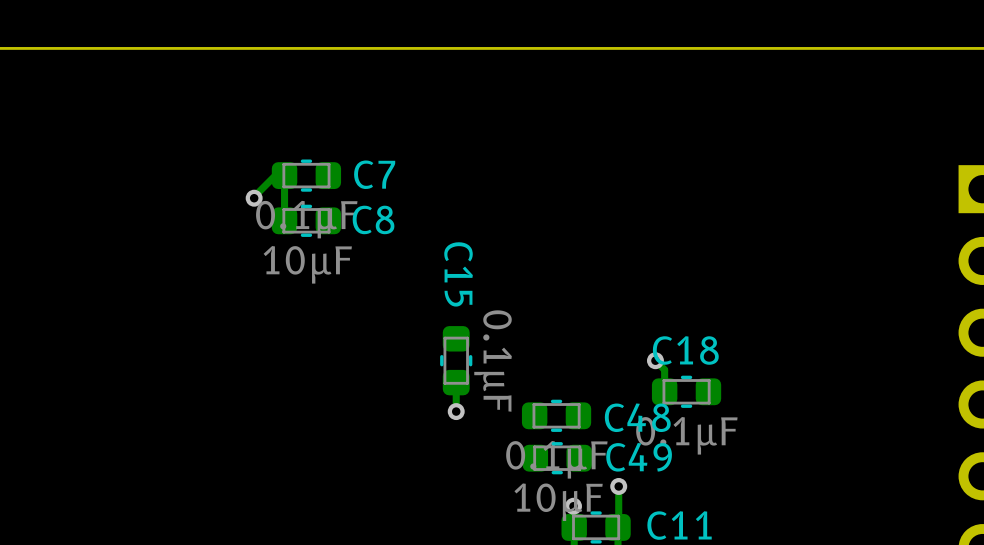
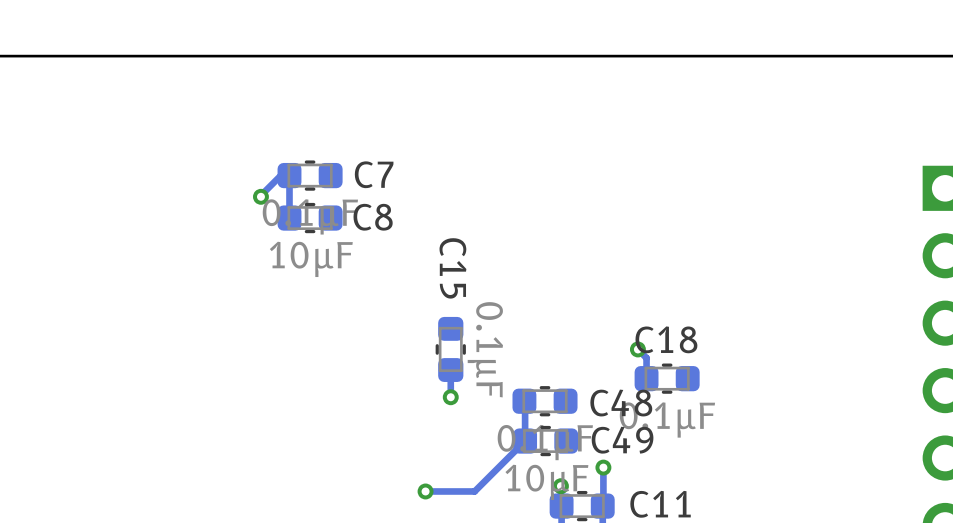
track: none -> (524, 401) (525, 441) (474, 491) (425, 491)
via: none -> (425, 491)

